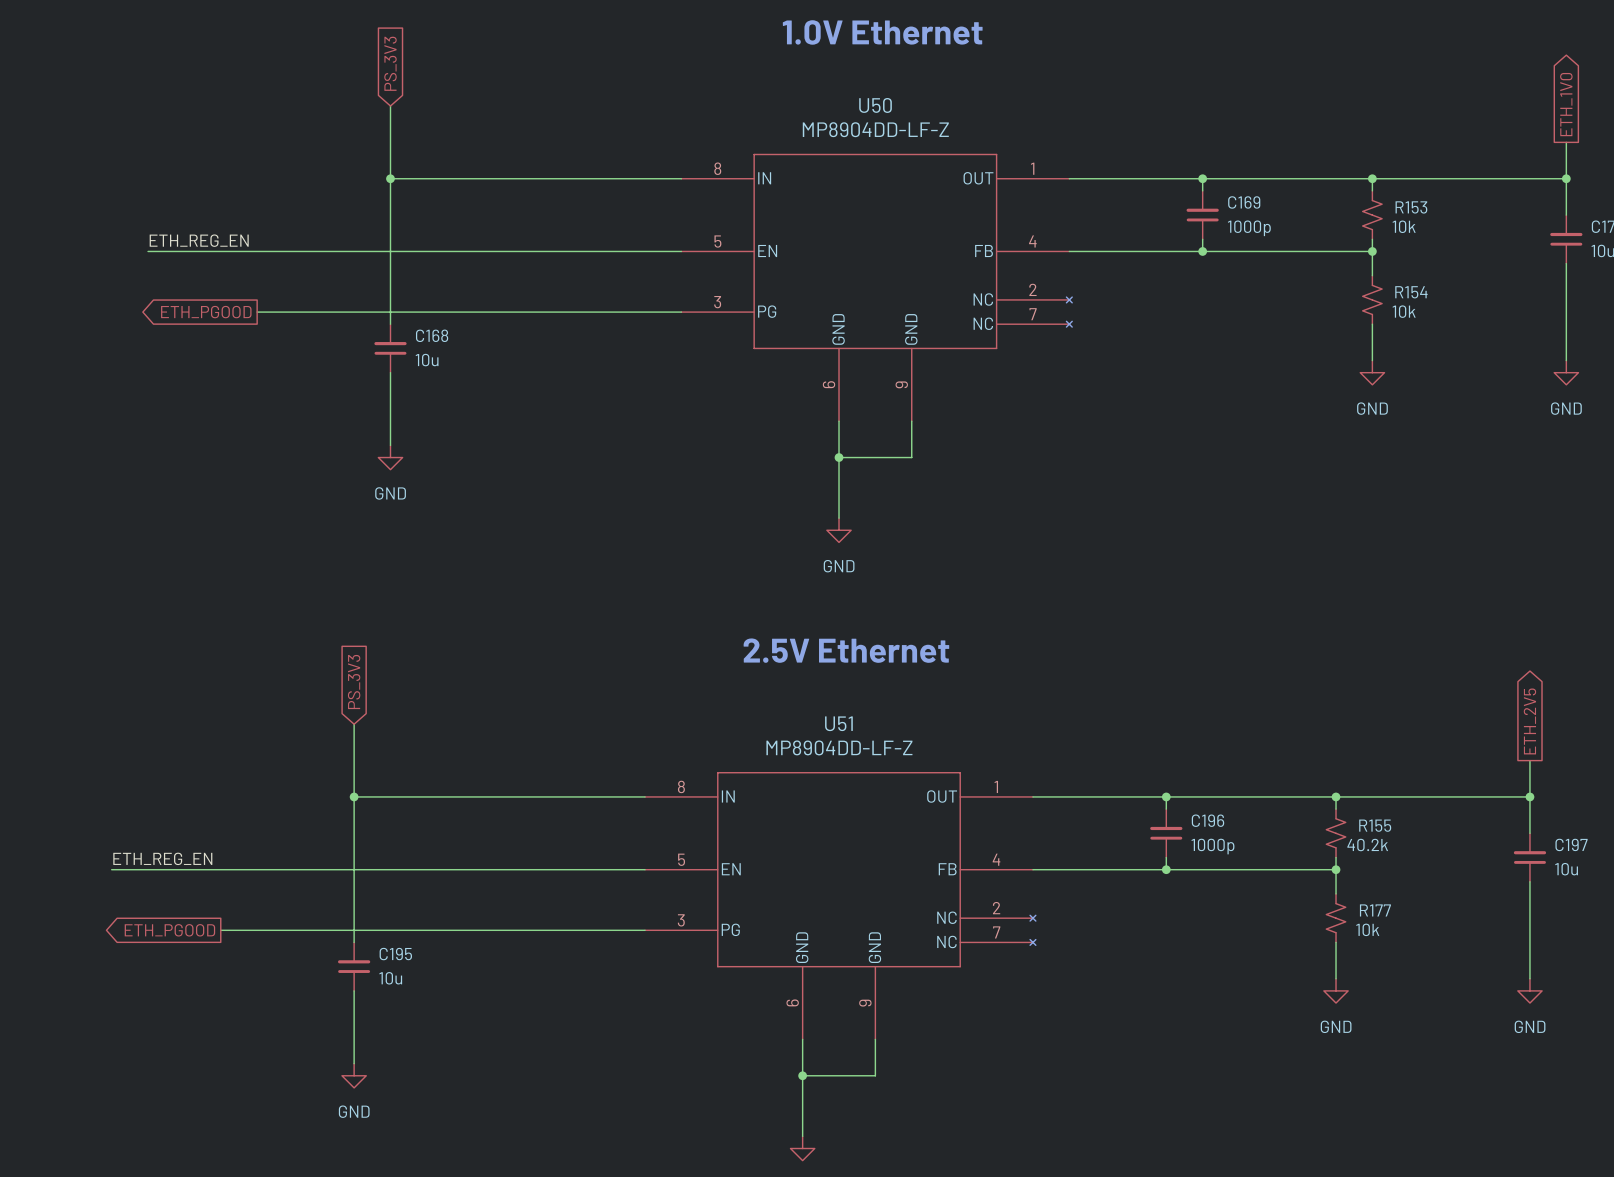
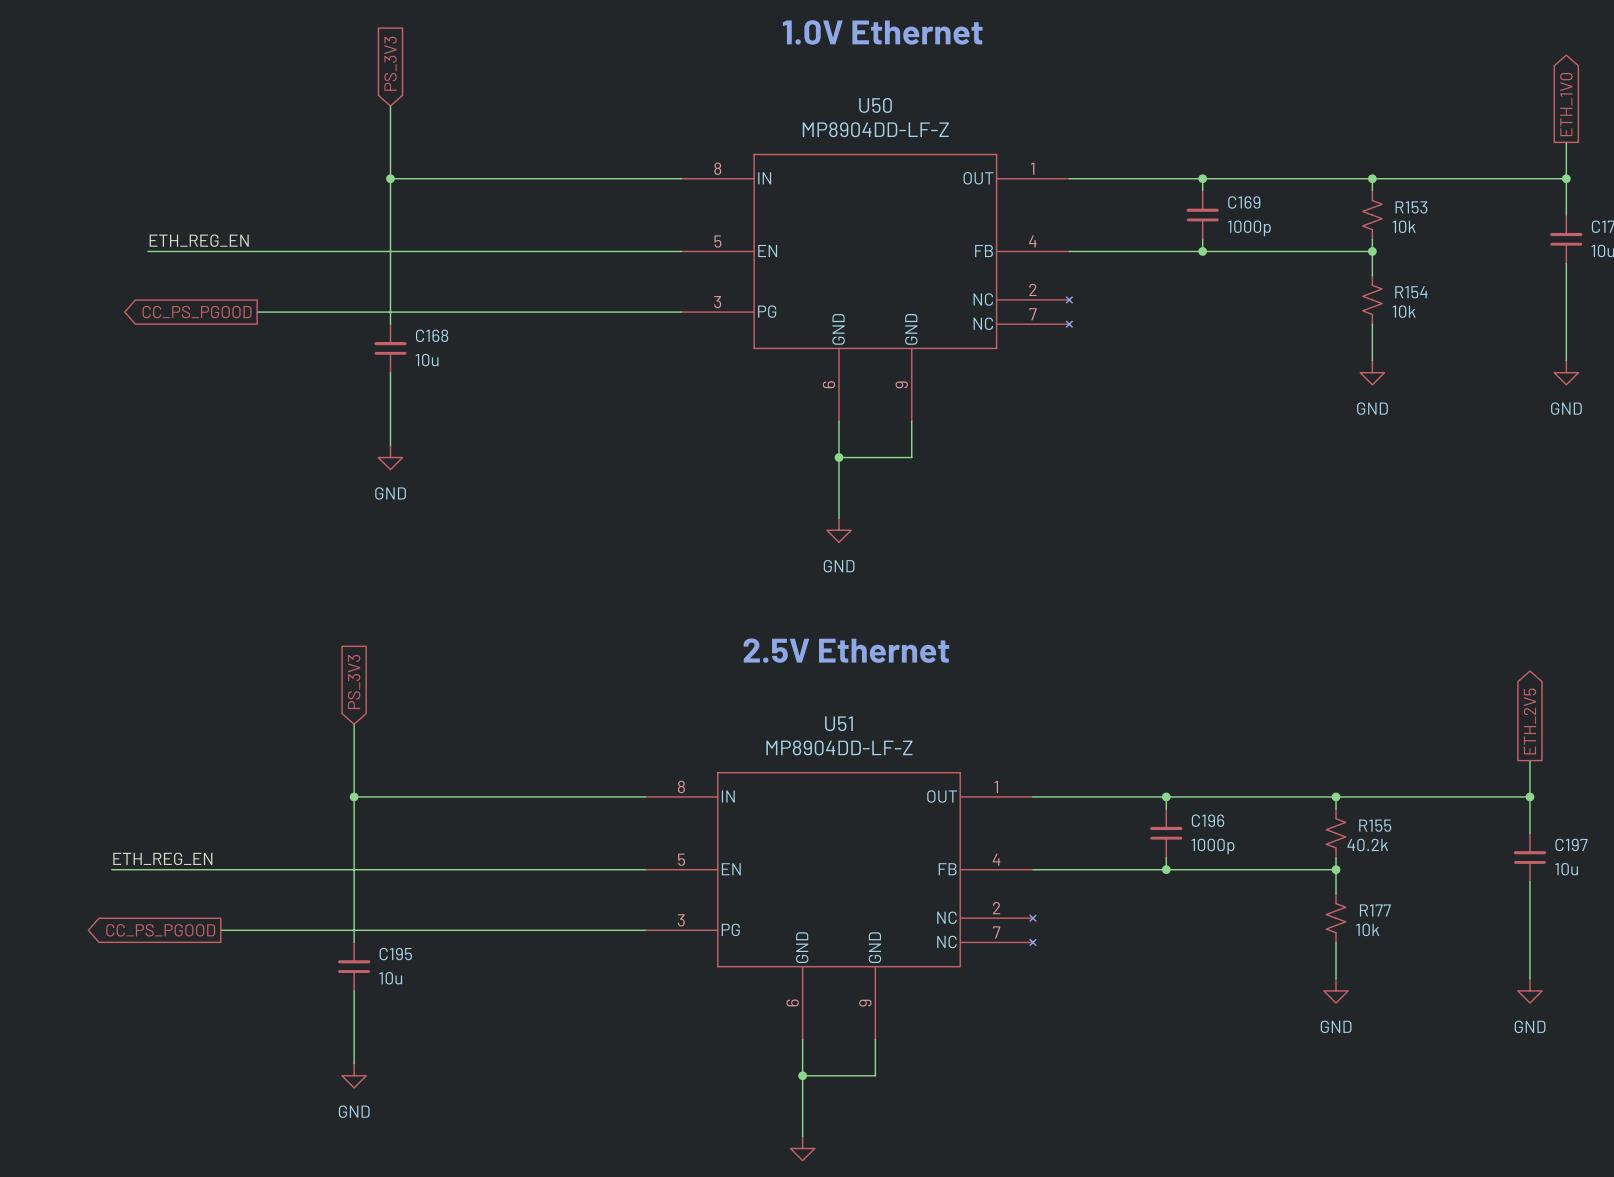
global label: ETH_PGOOD (206, 312) -> CC_PS_PGOOD (197, 312)
global label: ETH_PGOOD (169, 930) -> CC_PS_PGOOD (160, 930)

